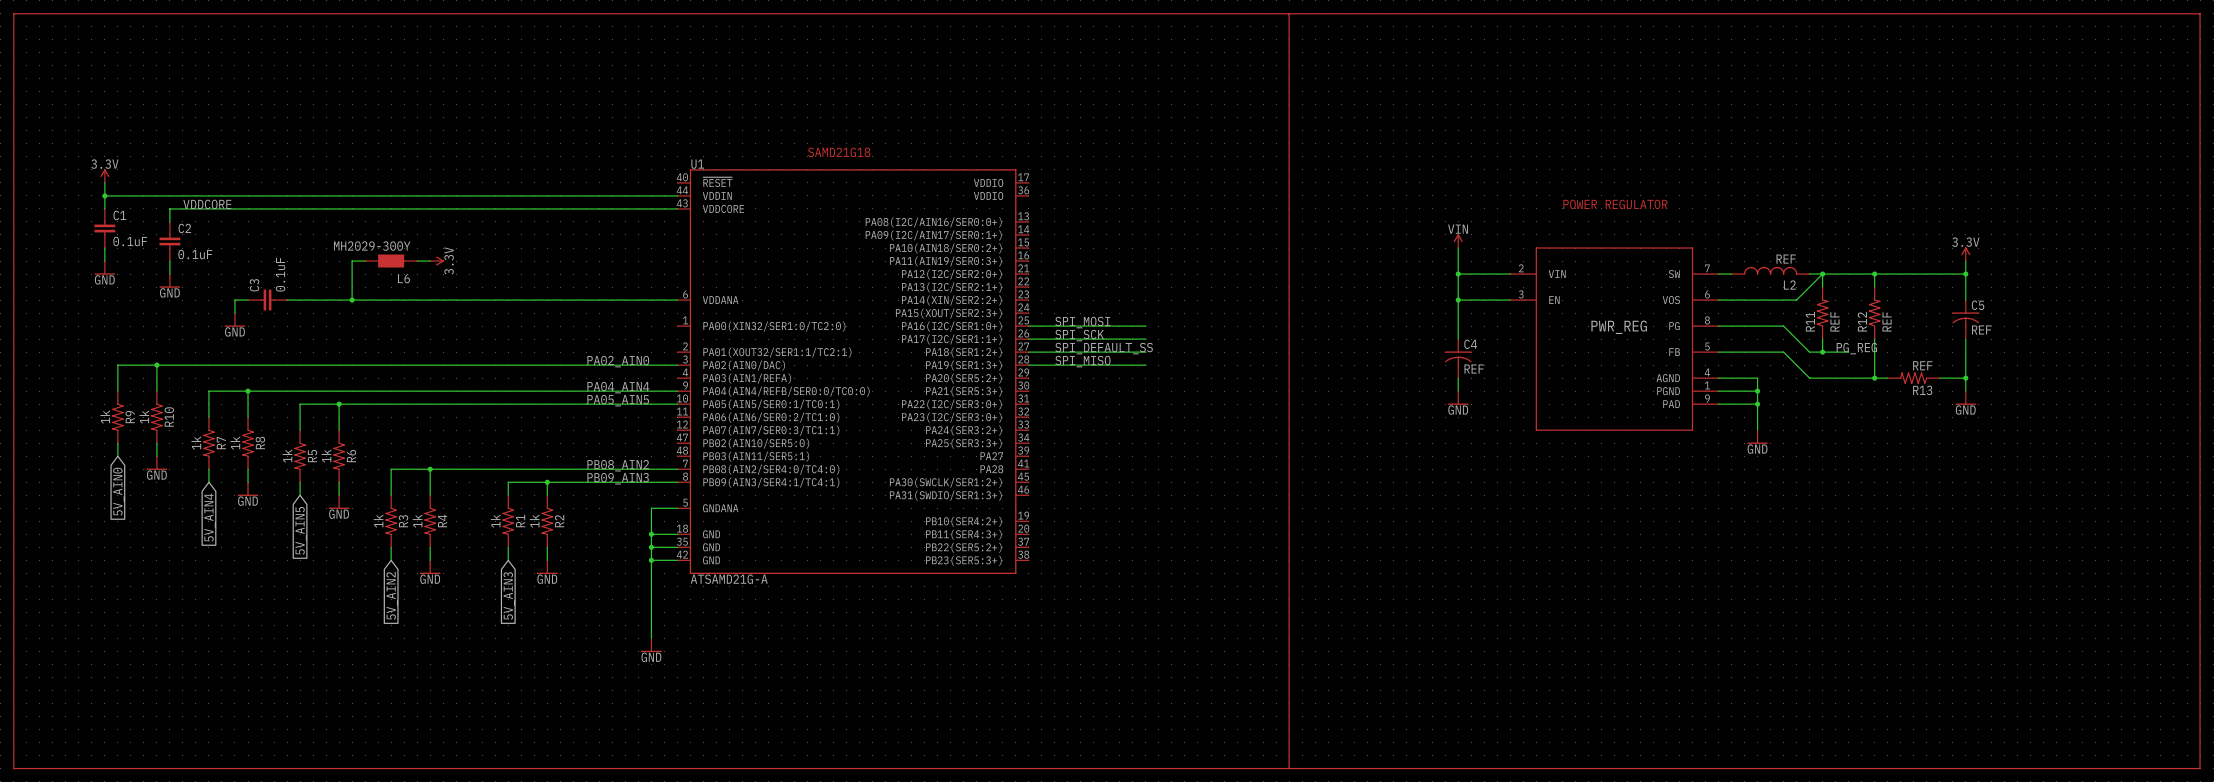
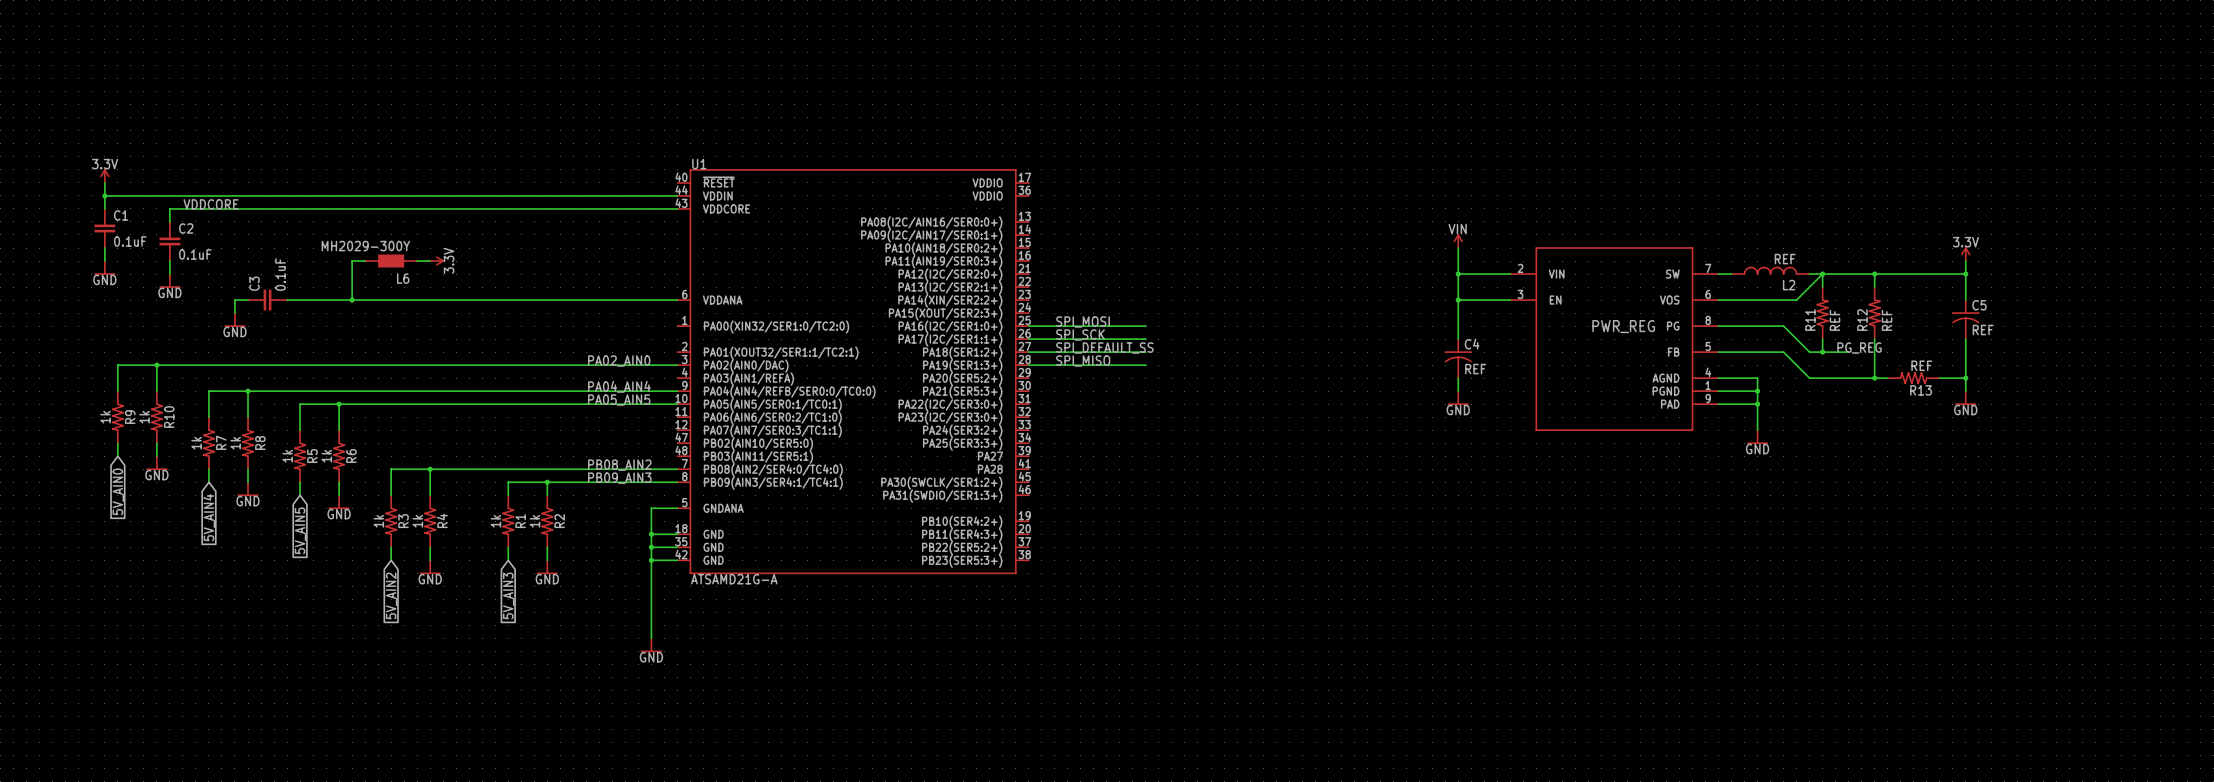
line: (13, 13) (13, 768) (2200, 768) (2200, 13) (13, 13) -> none
line: (1289, 13) (1289, 768) -> none
text: SAMD21G18 (839, 152) -> none
text: POWER REGULATOR (1615, 204) -> none

